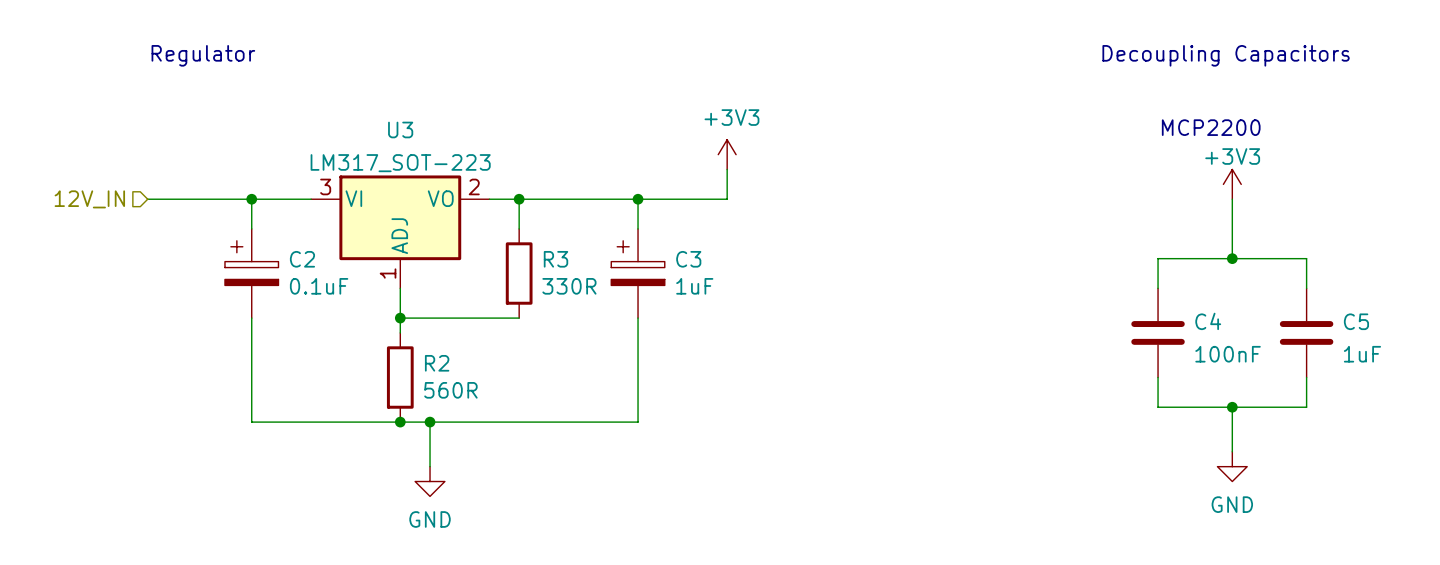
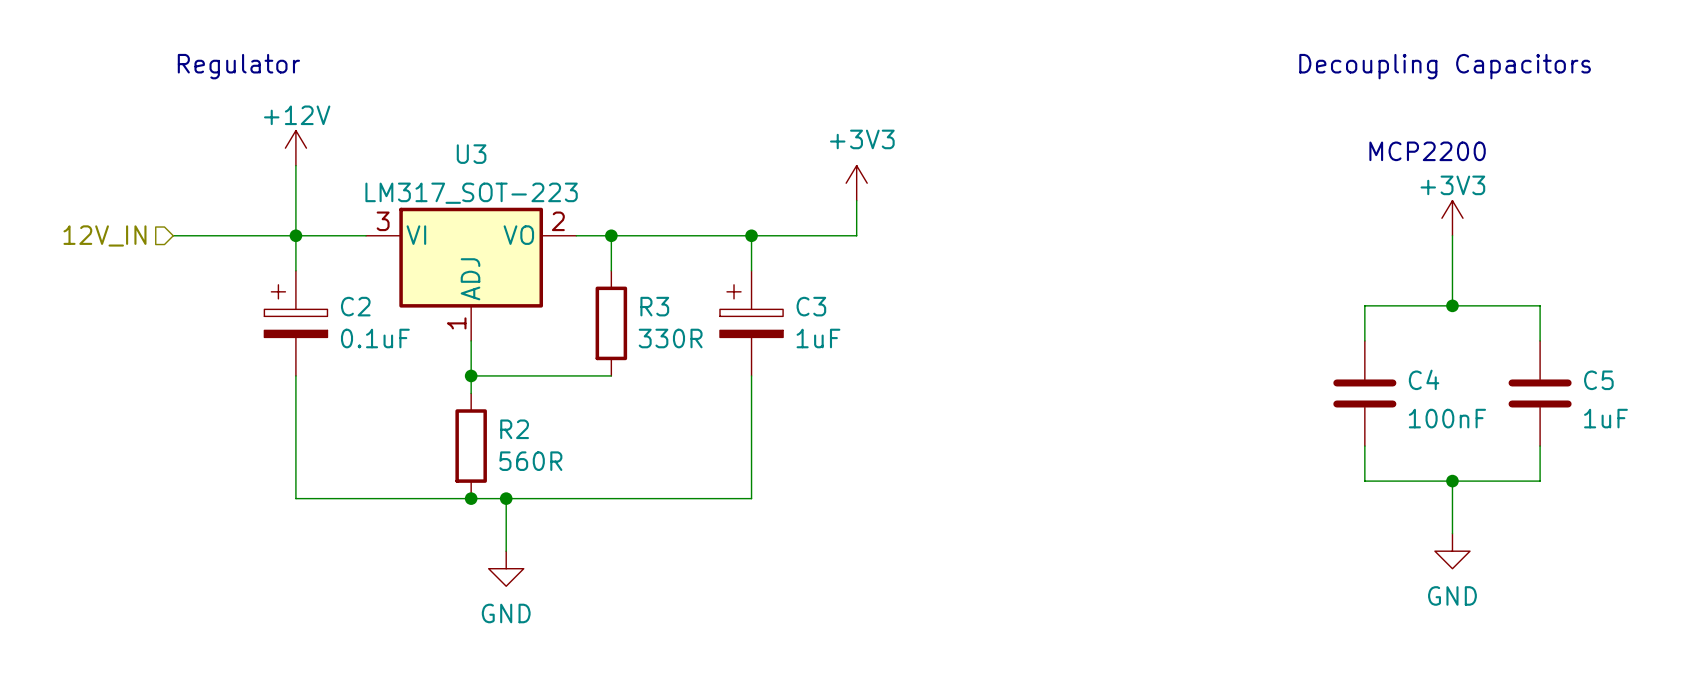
power symbol: none -> +12V (295, 148)
wire: none -> (295, 165) (295, 235)

